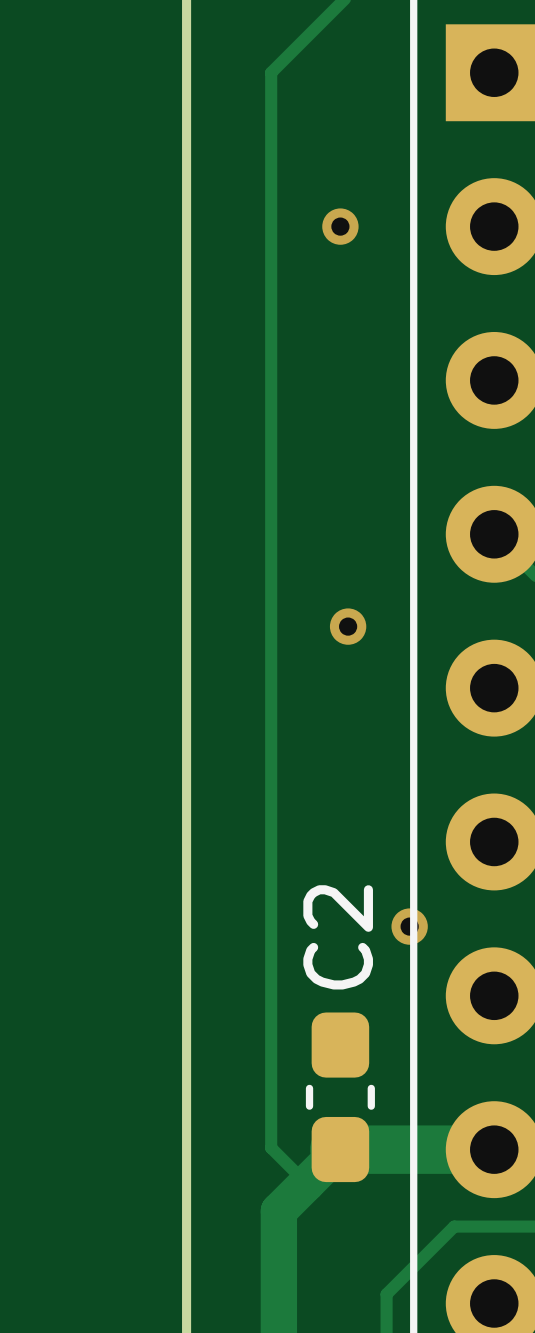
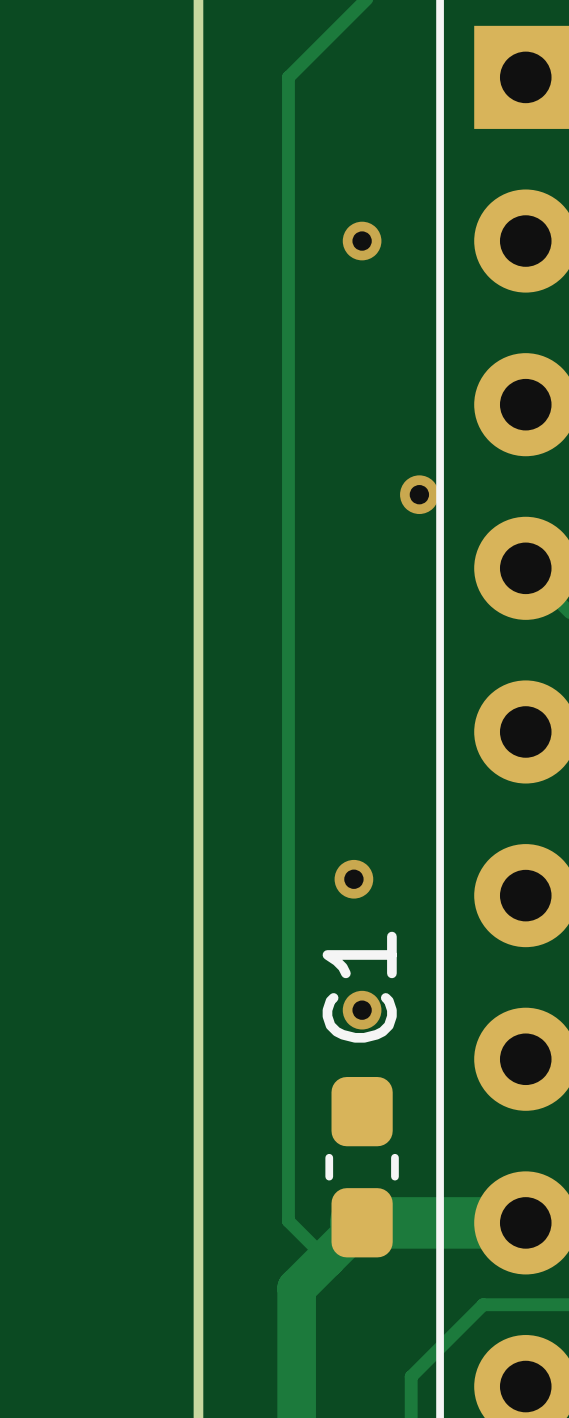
via: none -> (419, 494)
via: (348, 626) -> none
via: none -> (353, 879)
via: (409, 926) -> none
C2 name: C2 (338, 937) -> C1 (359, 987)
via: none -> (362, 1010)

